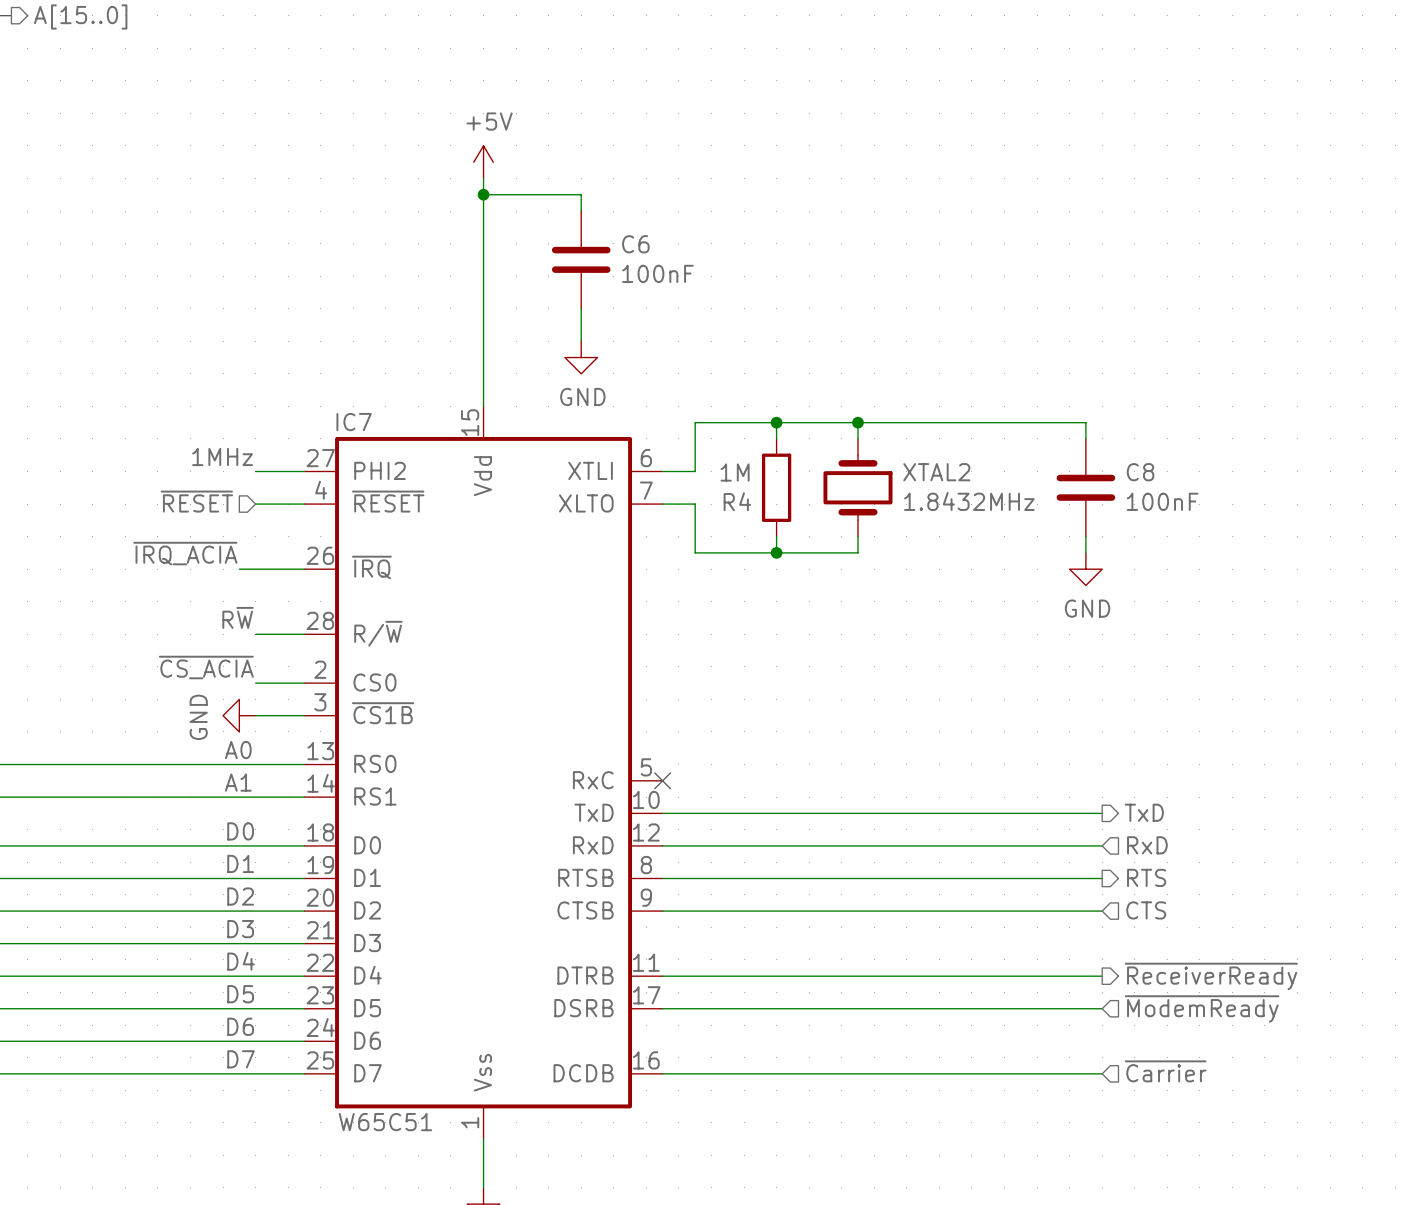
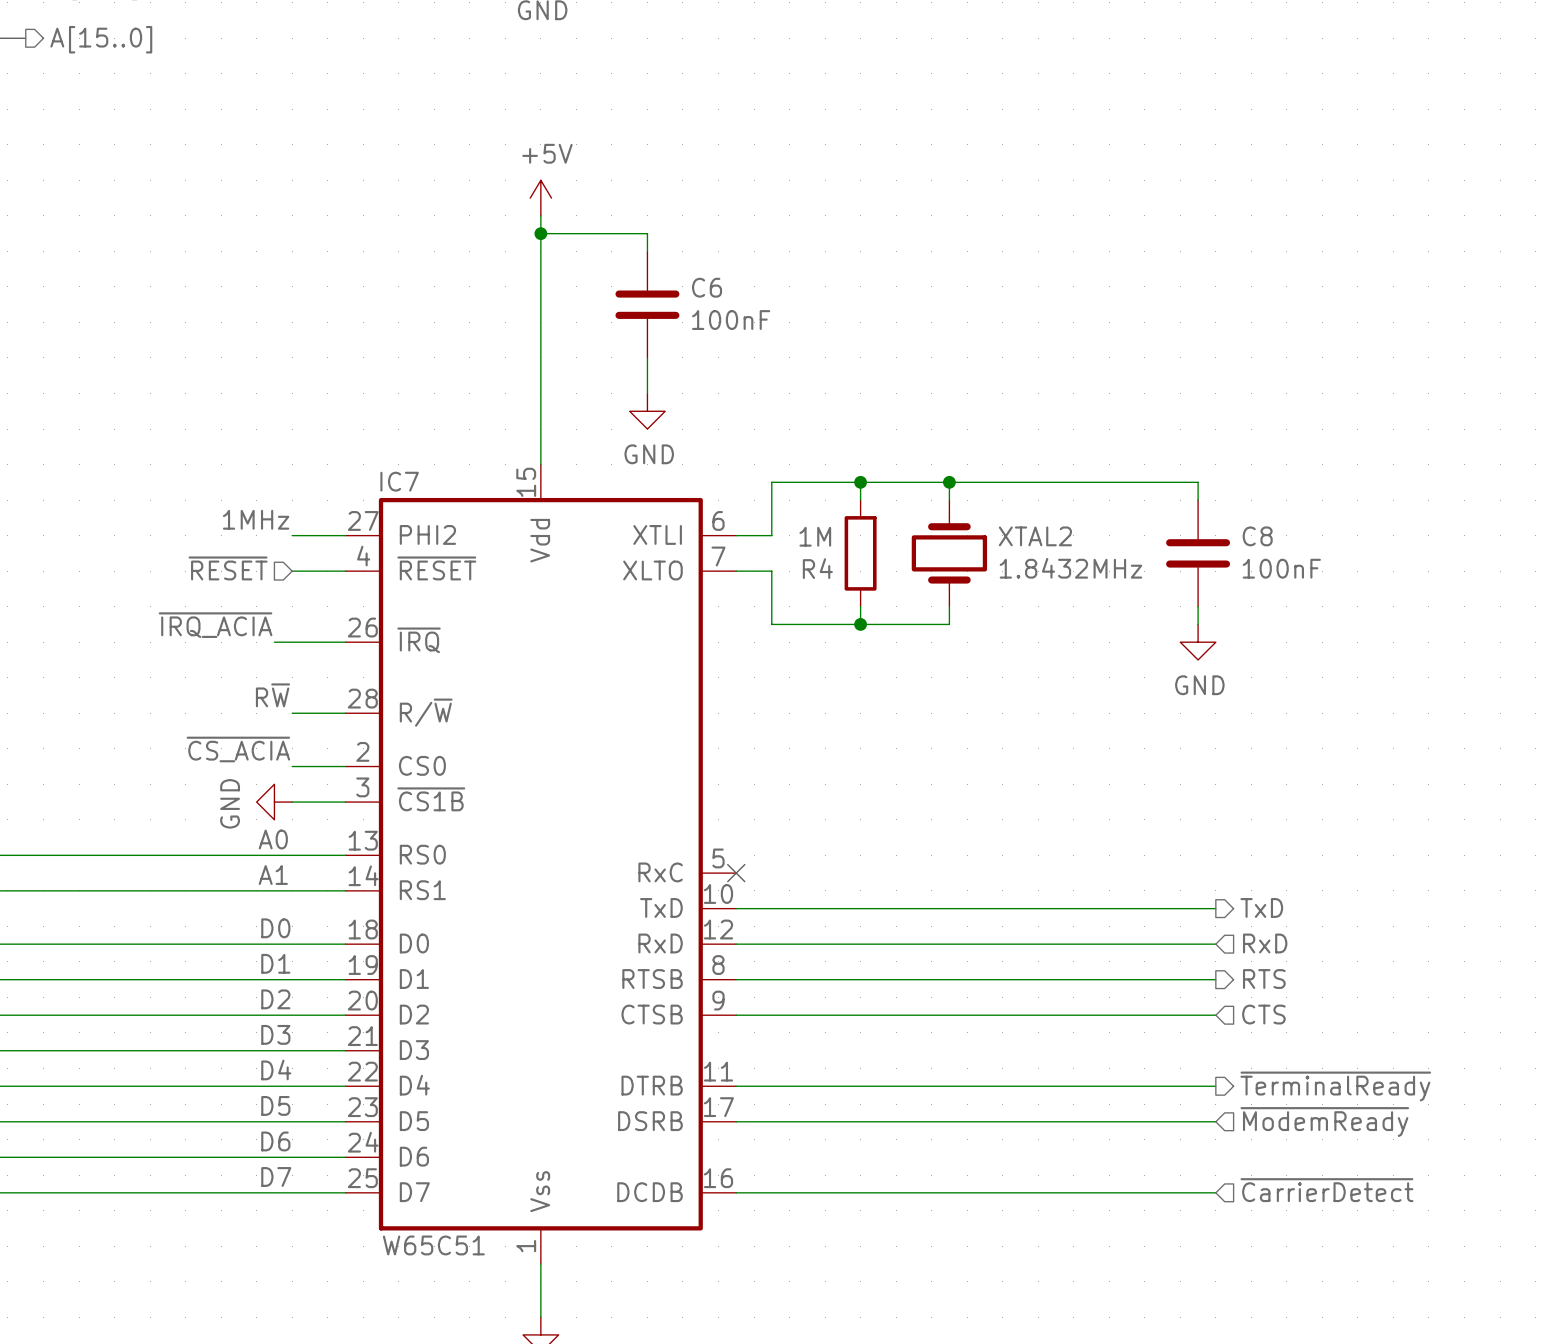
hierarchical label: ~{ReceiverReady} (1211, 976) -> ~{TerminalReady} (1335, 1086)
hierarchical label: ~{Carrier} (1165, 1071) -> ~{CarrierDetect} (1326, 1190)

